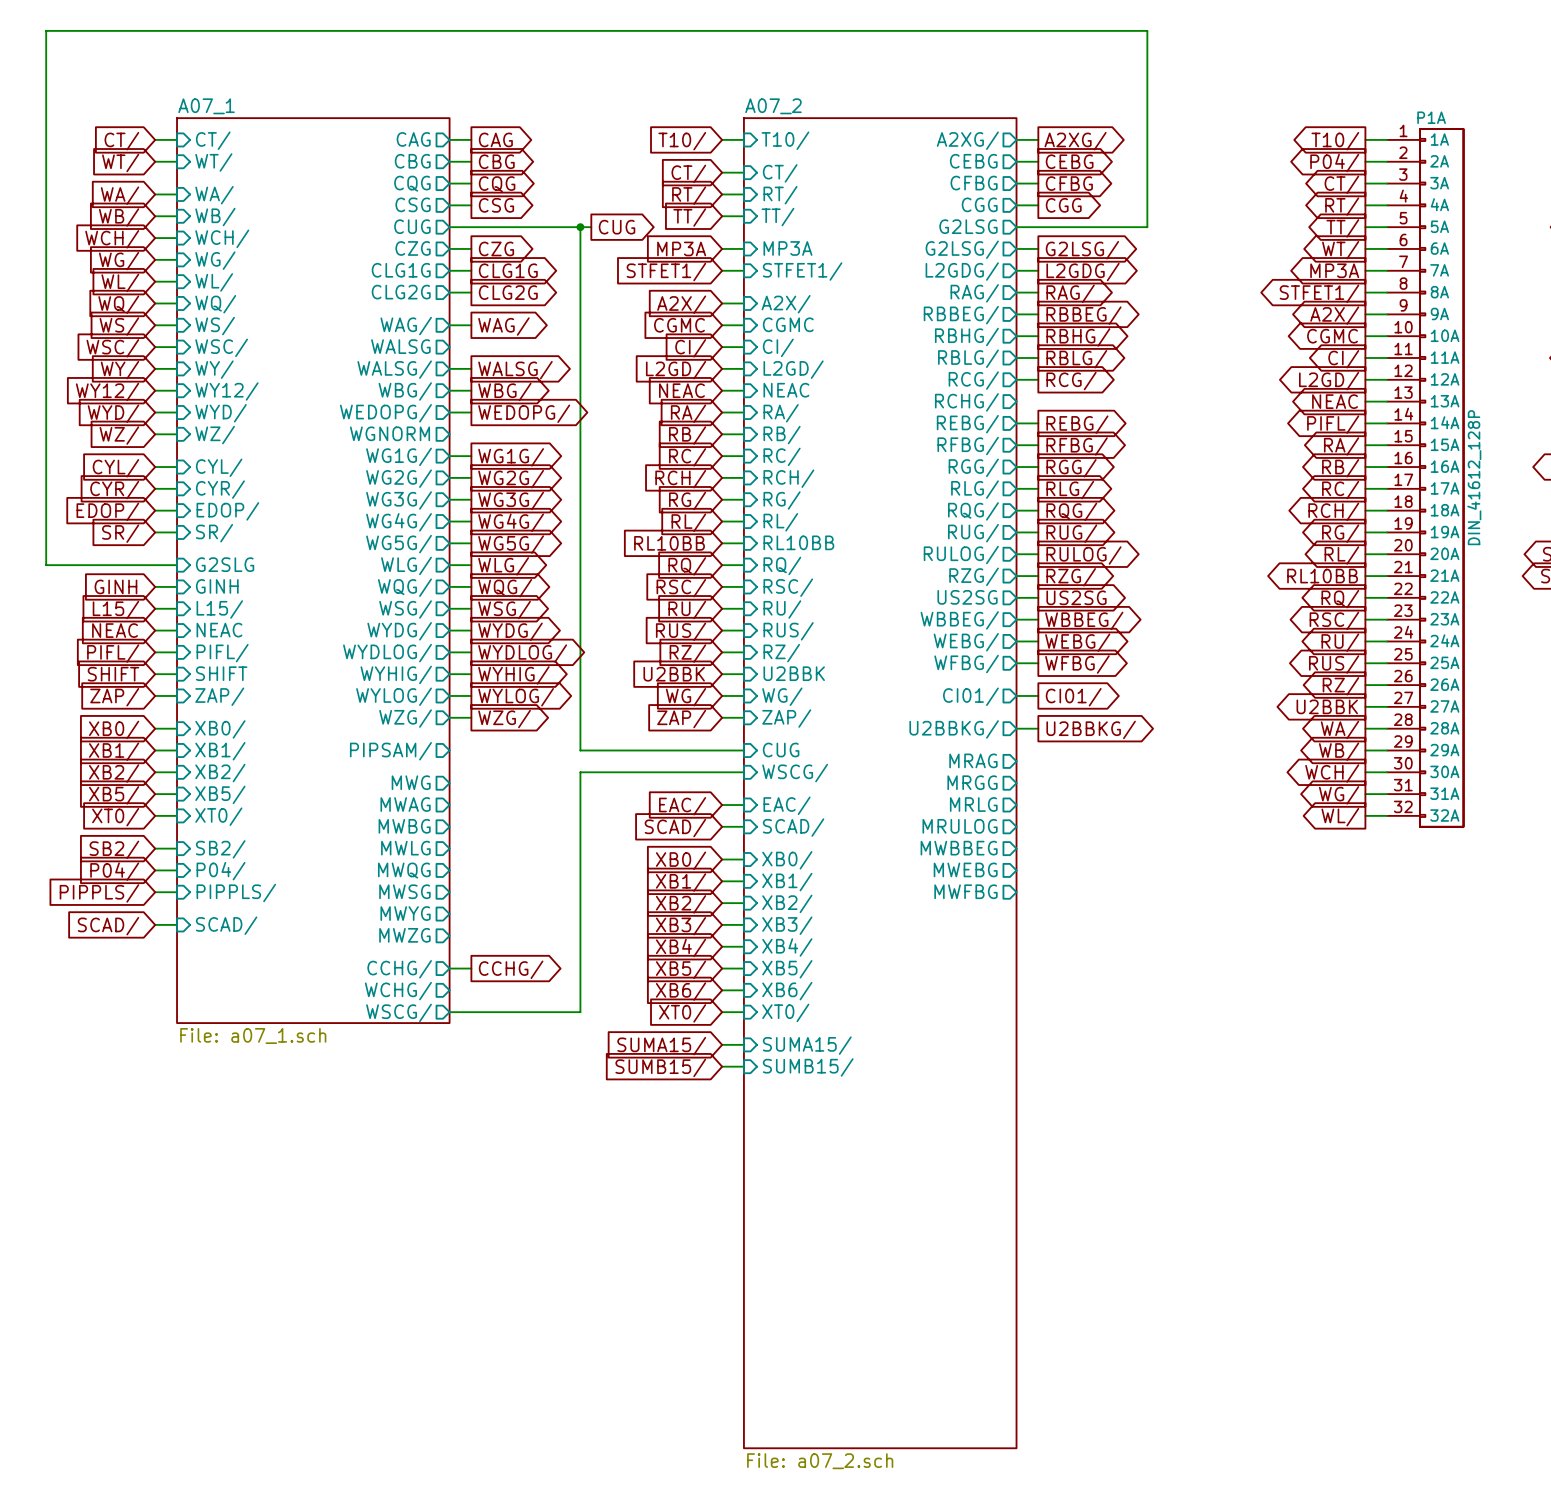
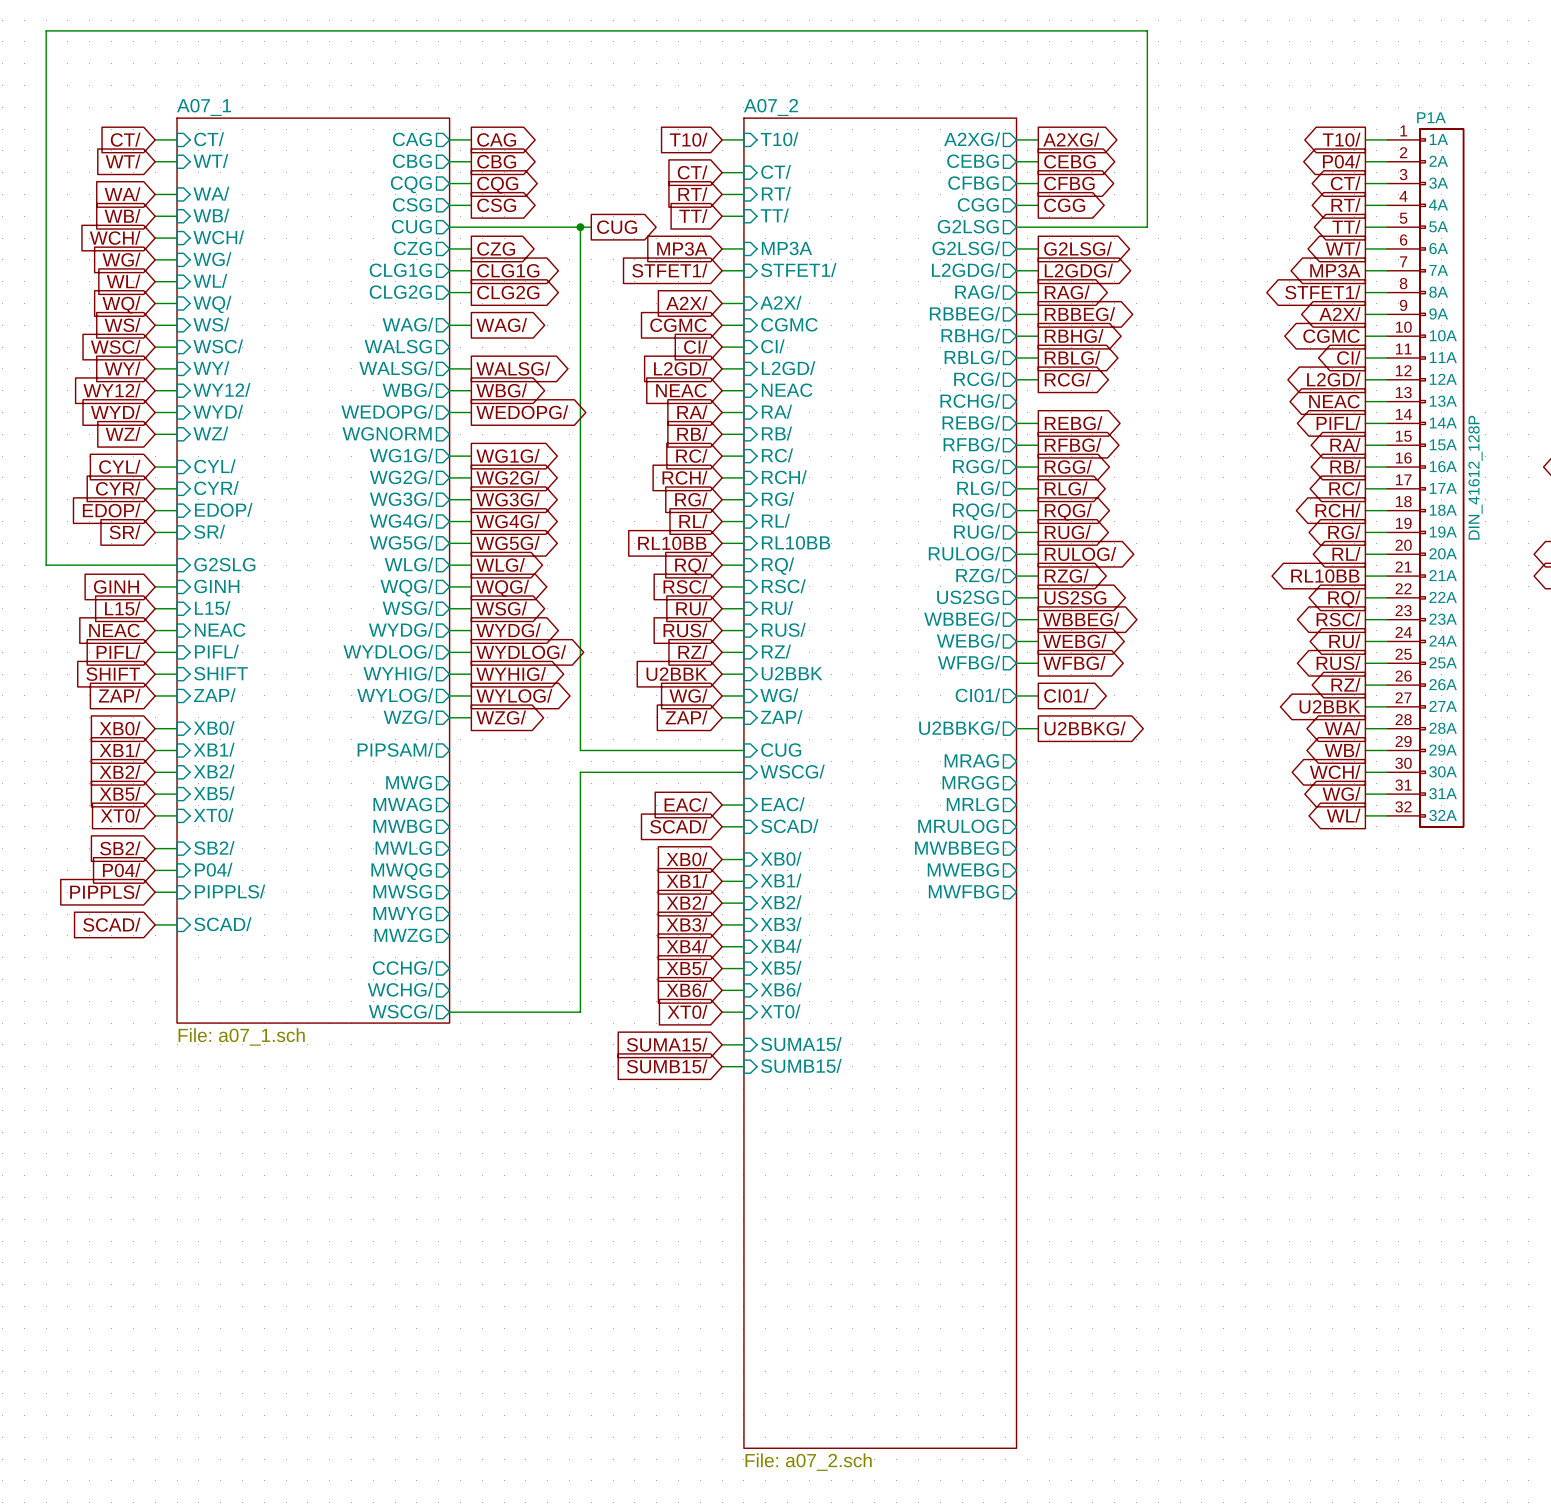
wire: (449, 968) (471, 968) -> none
global label: CCHG/ (511, 969) -> none

